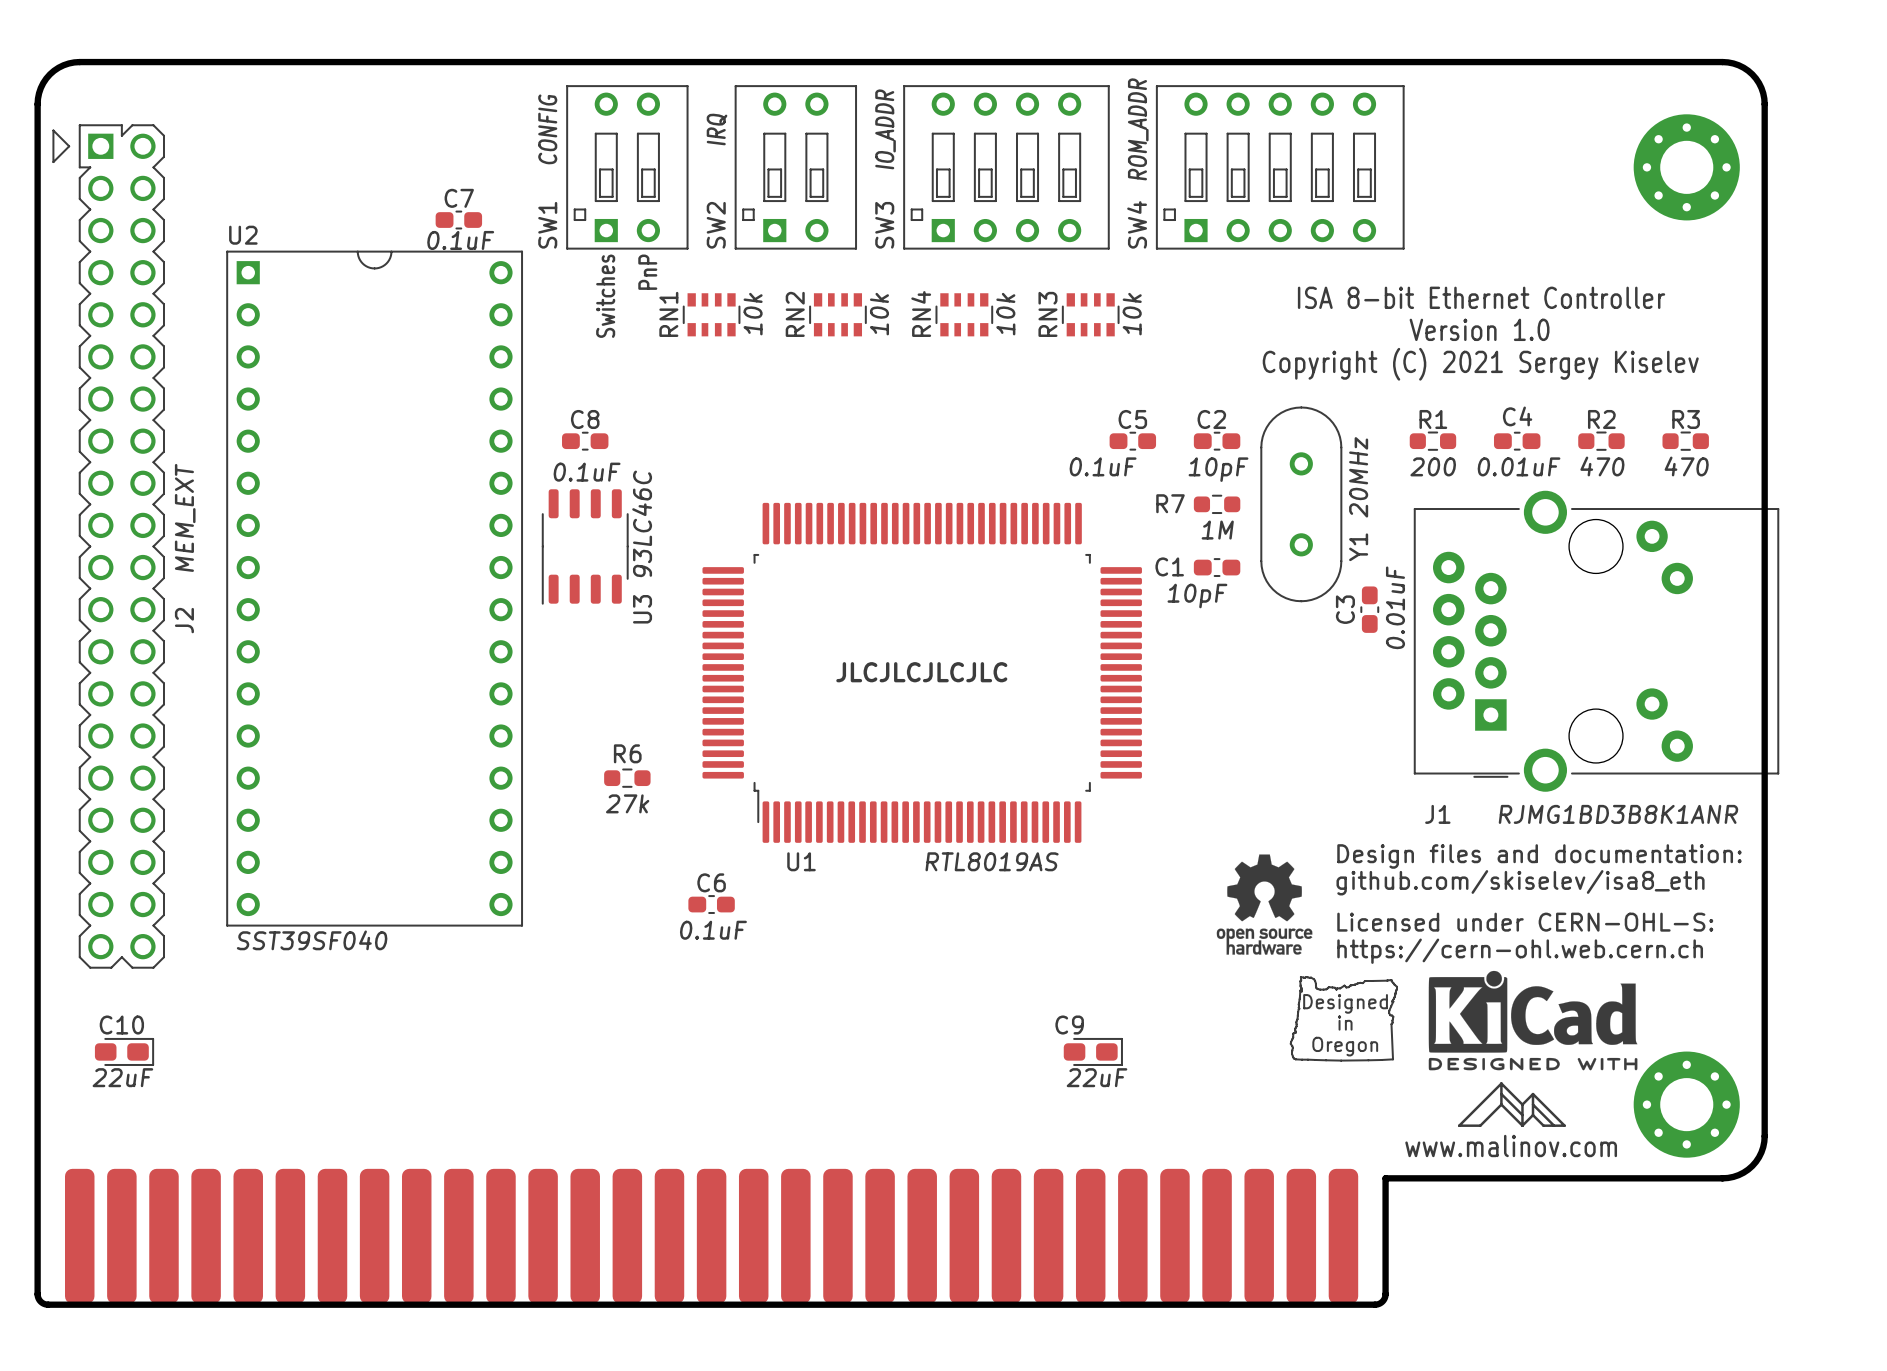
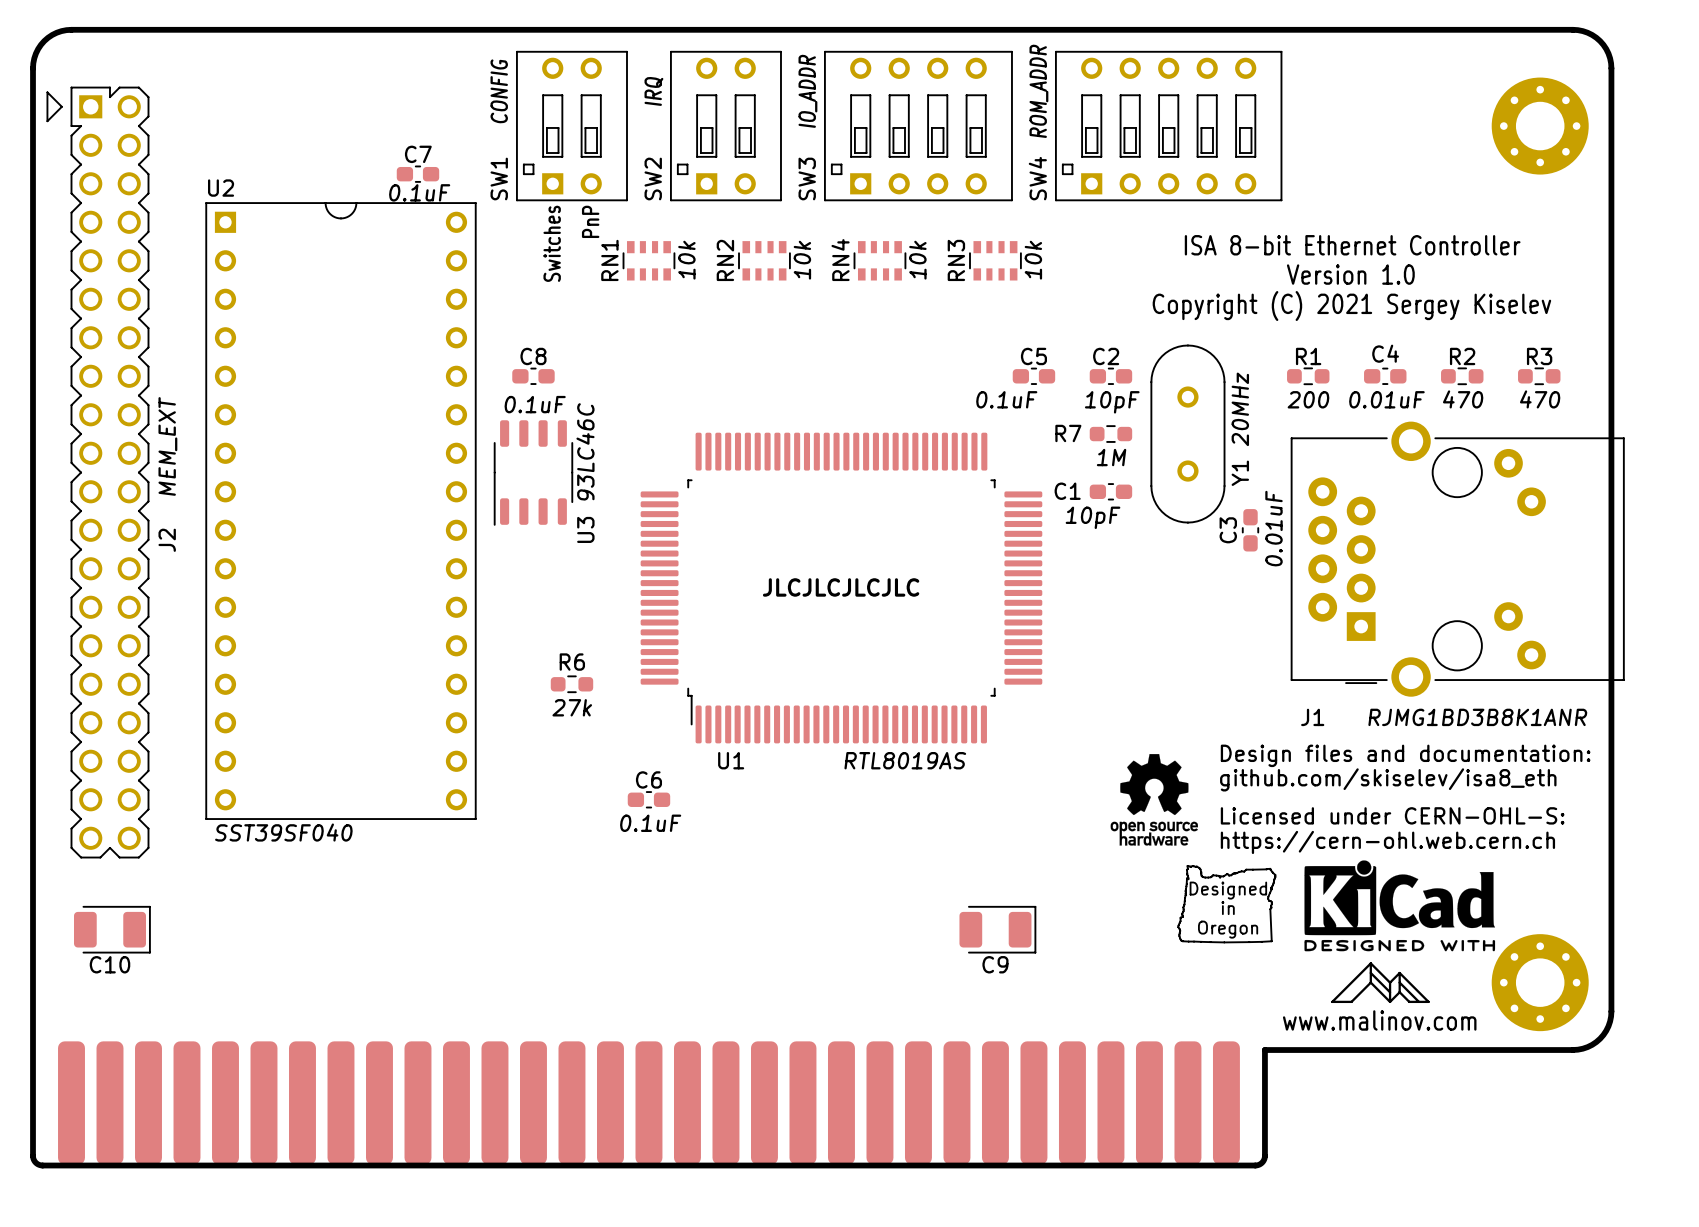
C10 name position: C10 (121, 1025) -> C10 (109, 964)
C9 name position: C9 (1069, 1025) -> C9 (995, 964)
C10 footprint: [94, 1037, 155, 1066] -> [74, 905, 151, 954]
C9 footprint: [1063, 1037, 1123, 1066] -> [959, 905, 1037, 954]
C10 value: 22uF (122, 1077) -> none
C9 value: 22uF (1097, 1077) -> none

